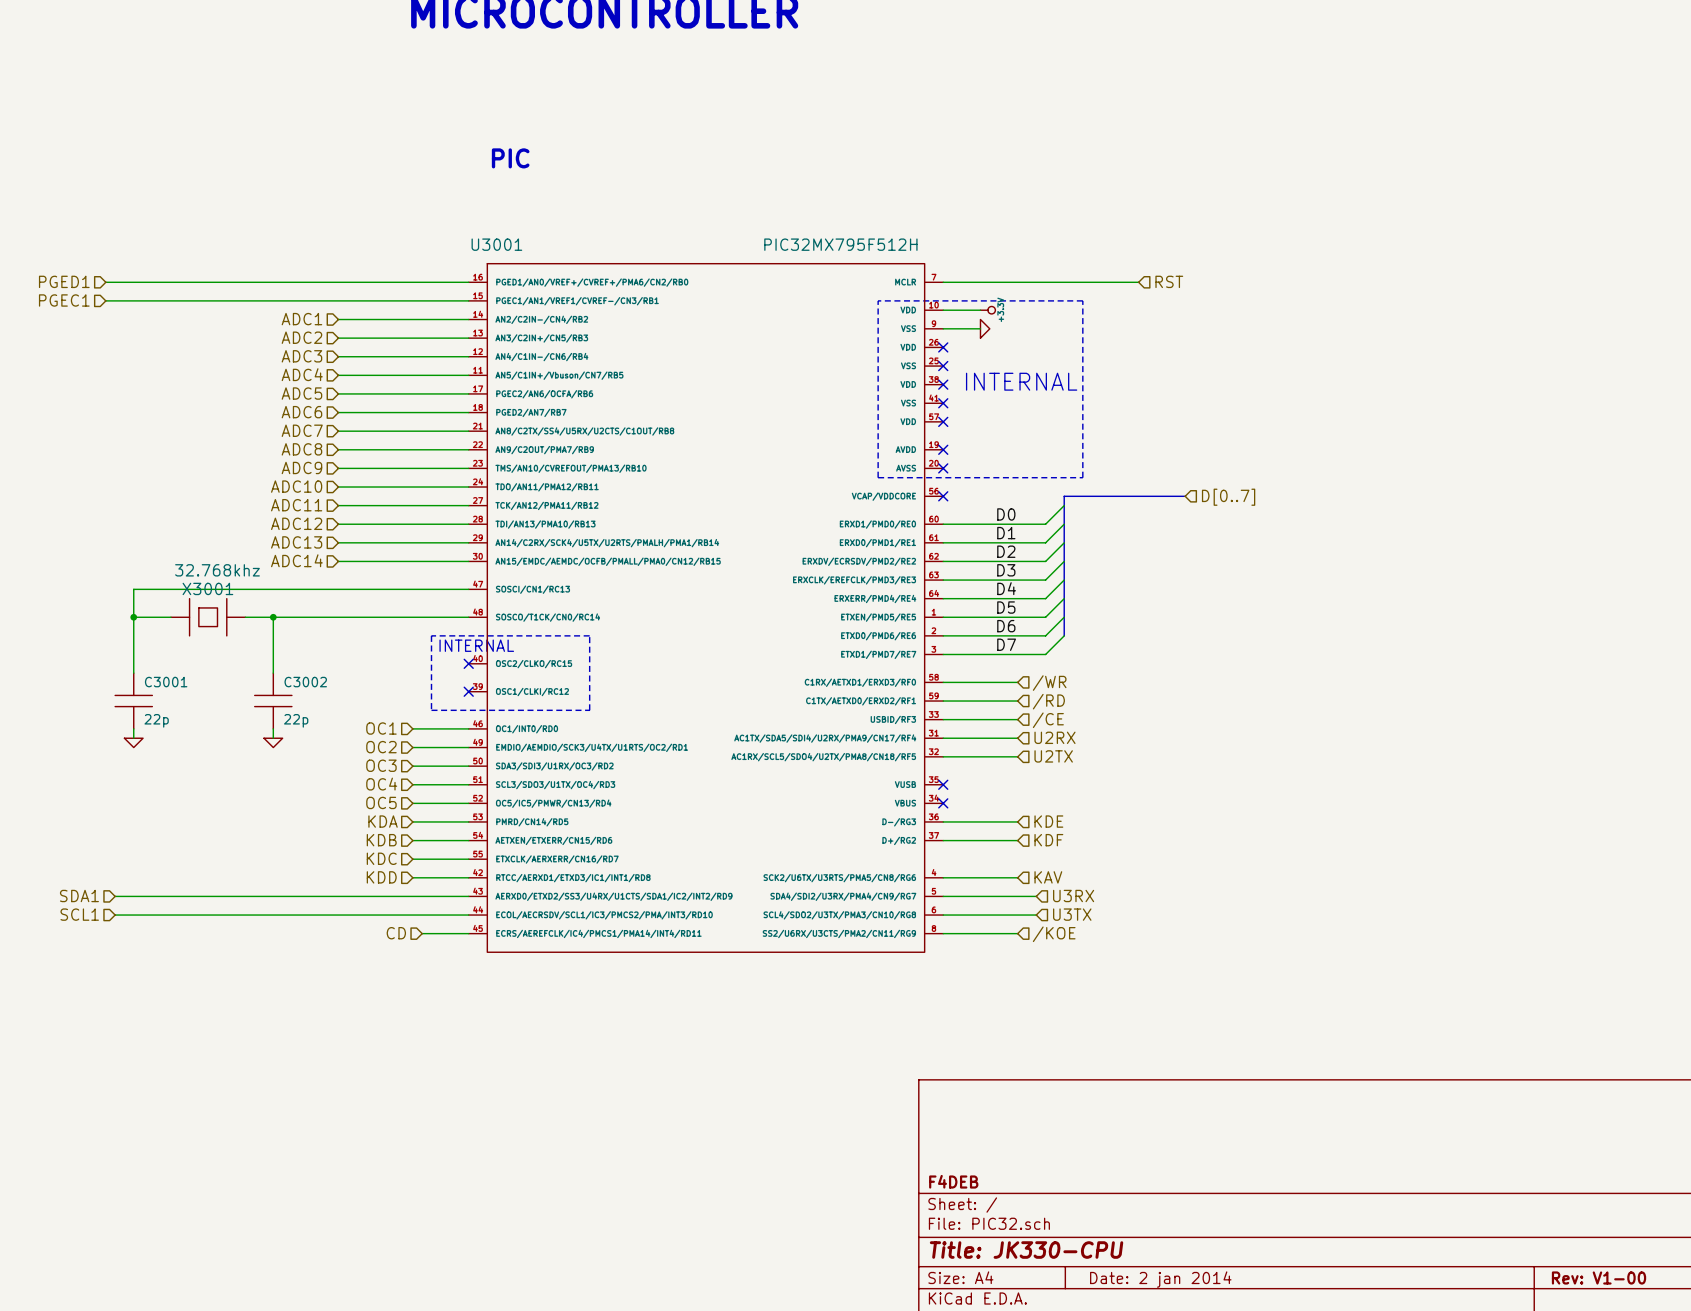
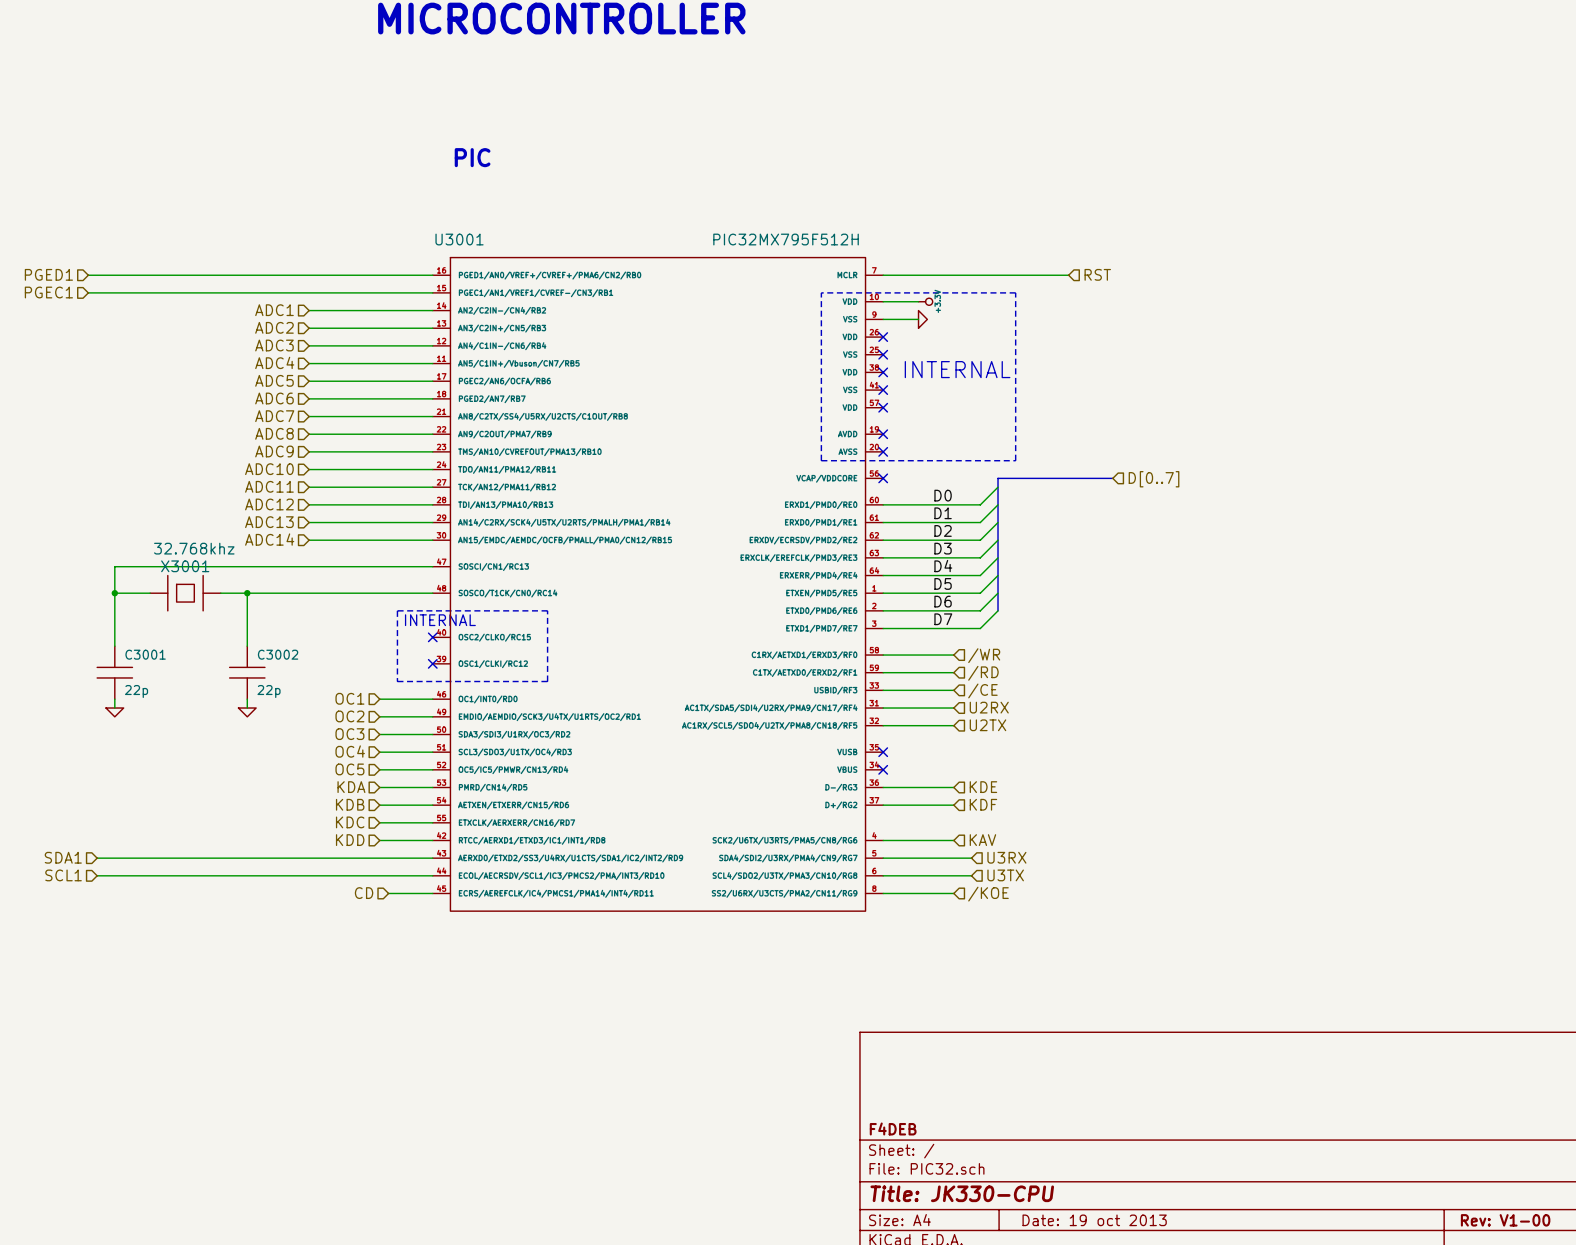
title block: Date: 2 jan 2014 (1160, 1279) -> Date: 19 oct 2013 (1094, 1220)

